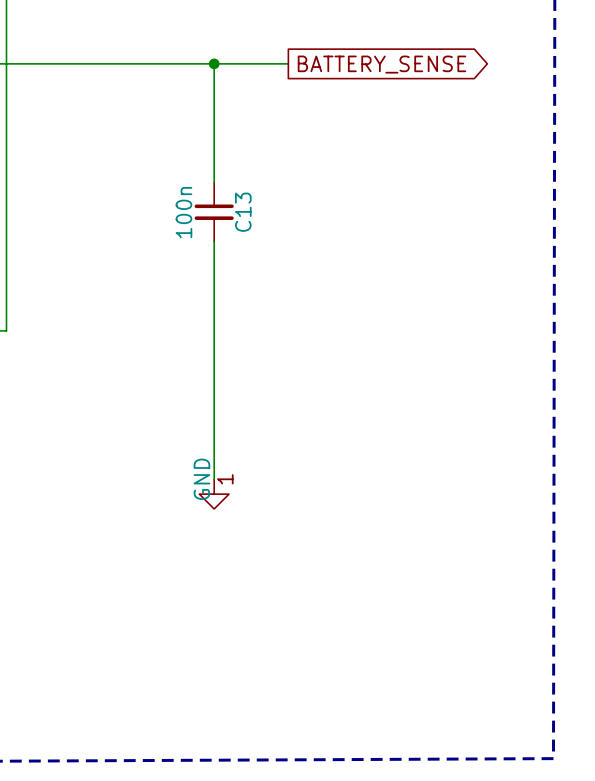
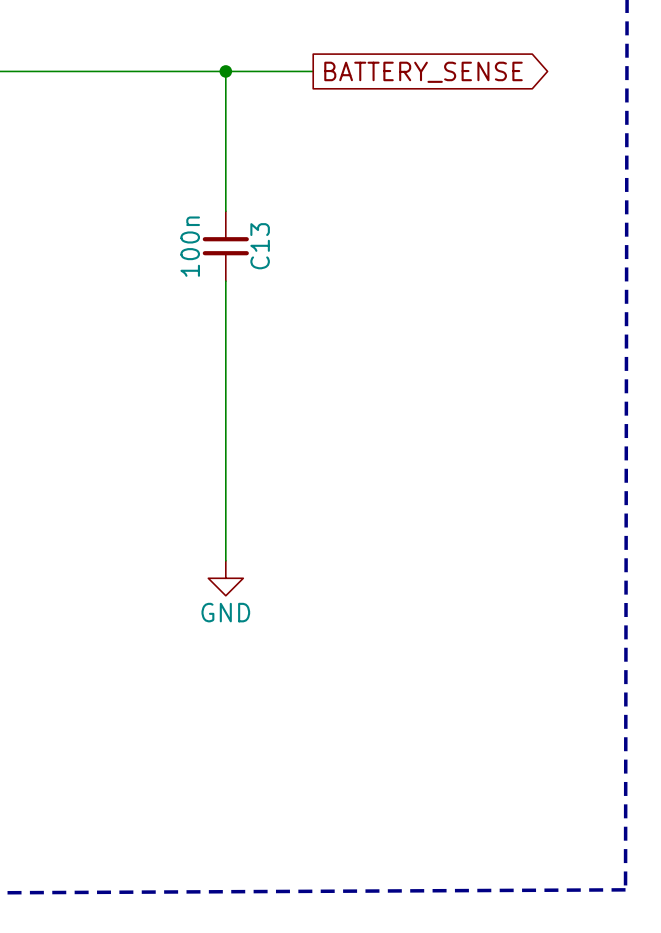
power symbol pin name: GND (201, 479) -> none
power symbol pin number: 1 (225, 479) -> none
power symbol text: none -> GND (225, 612)

